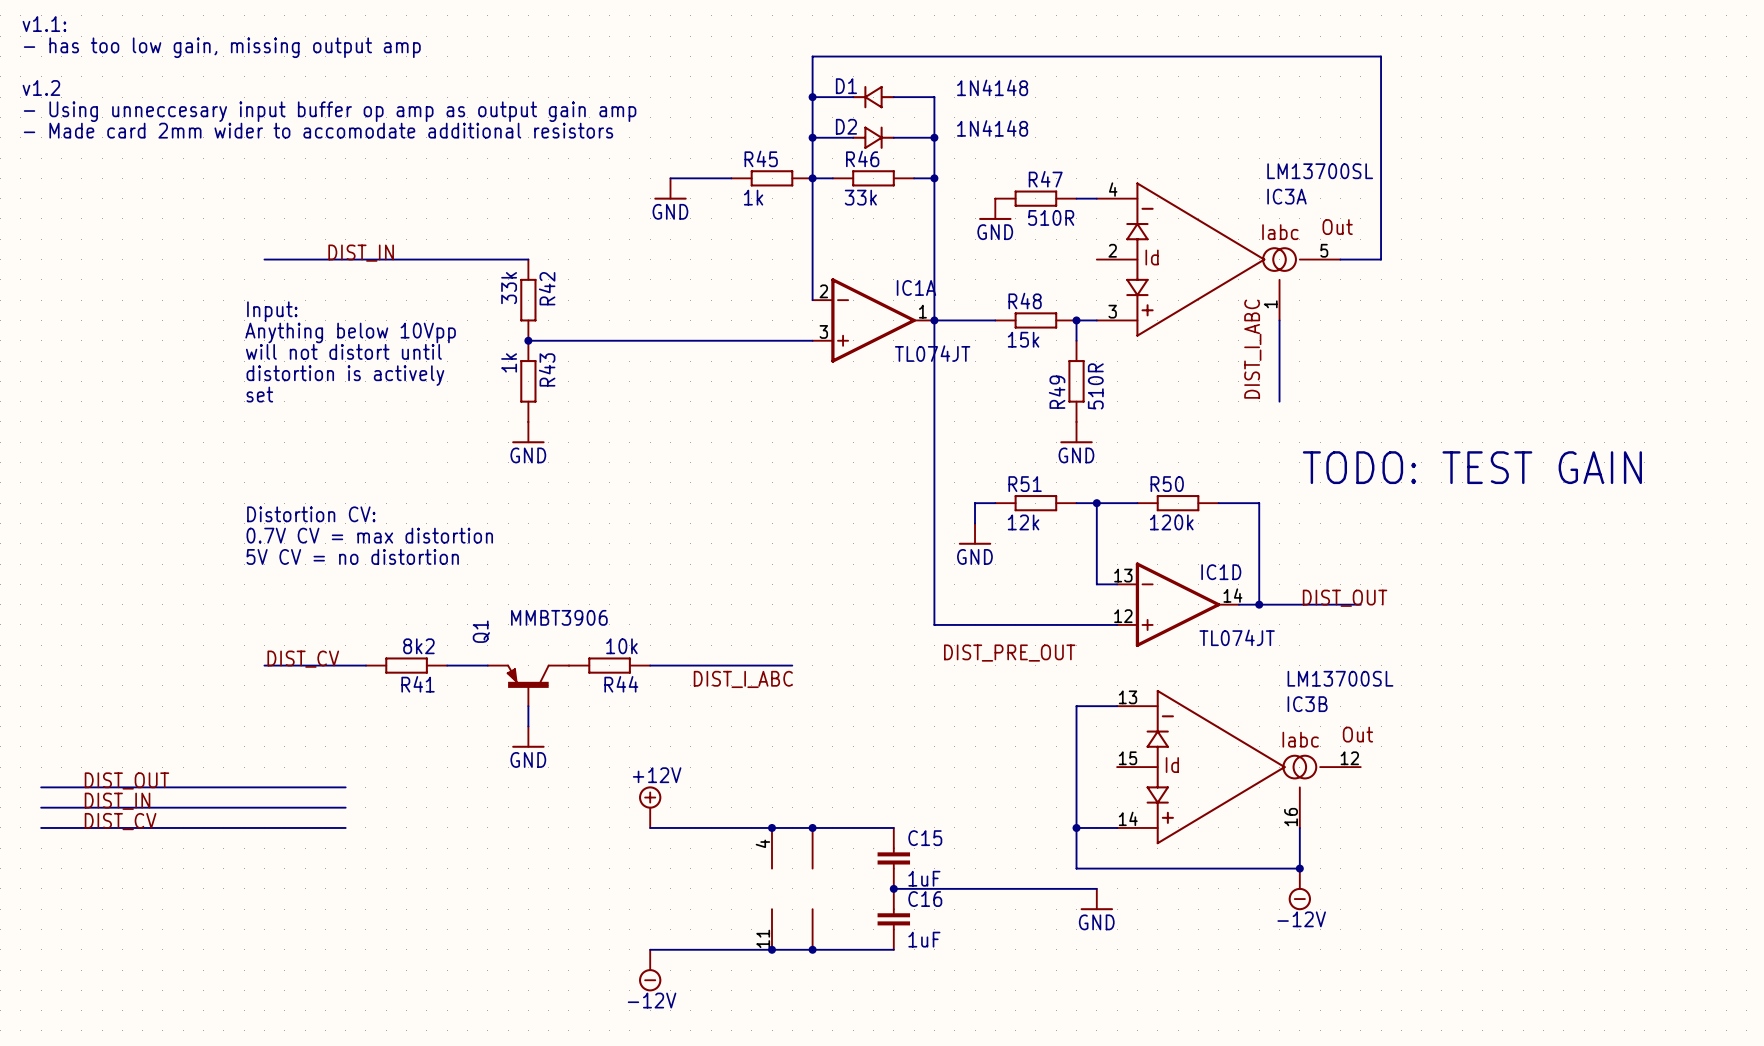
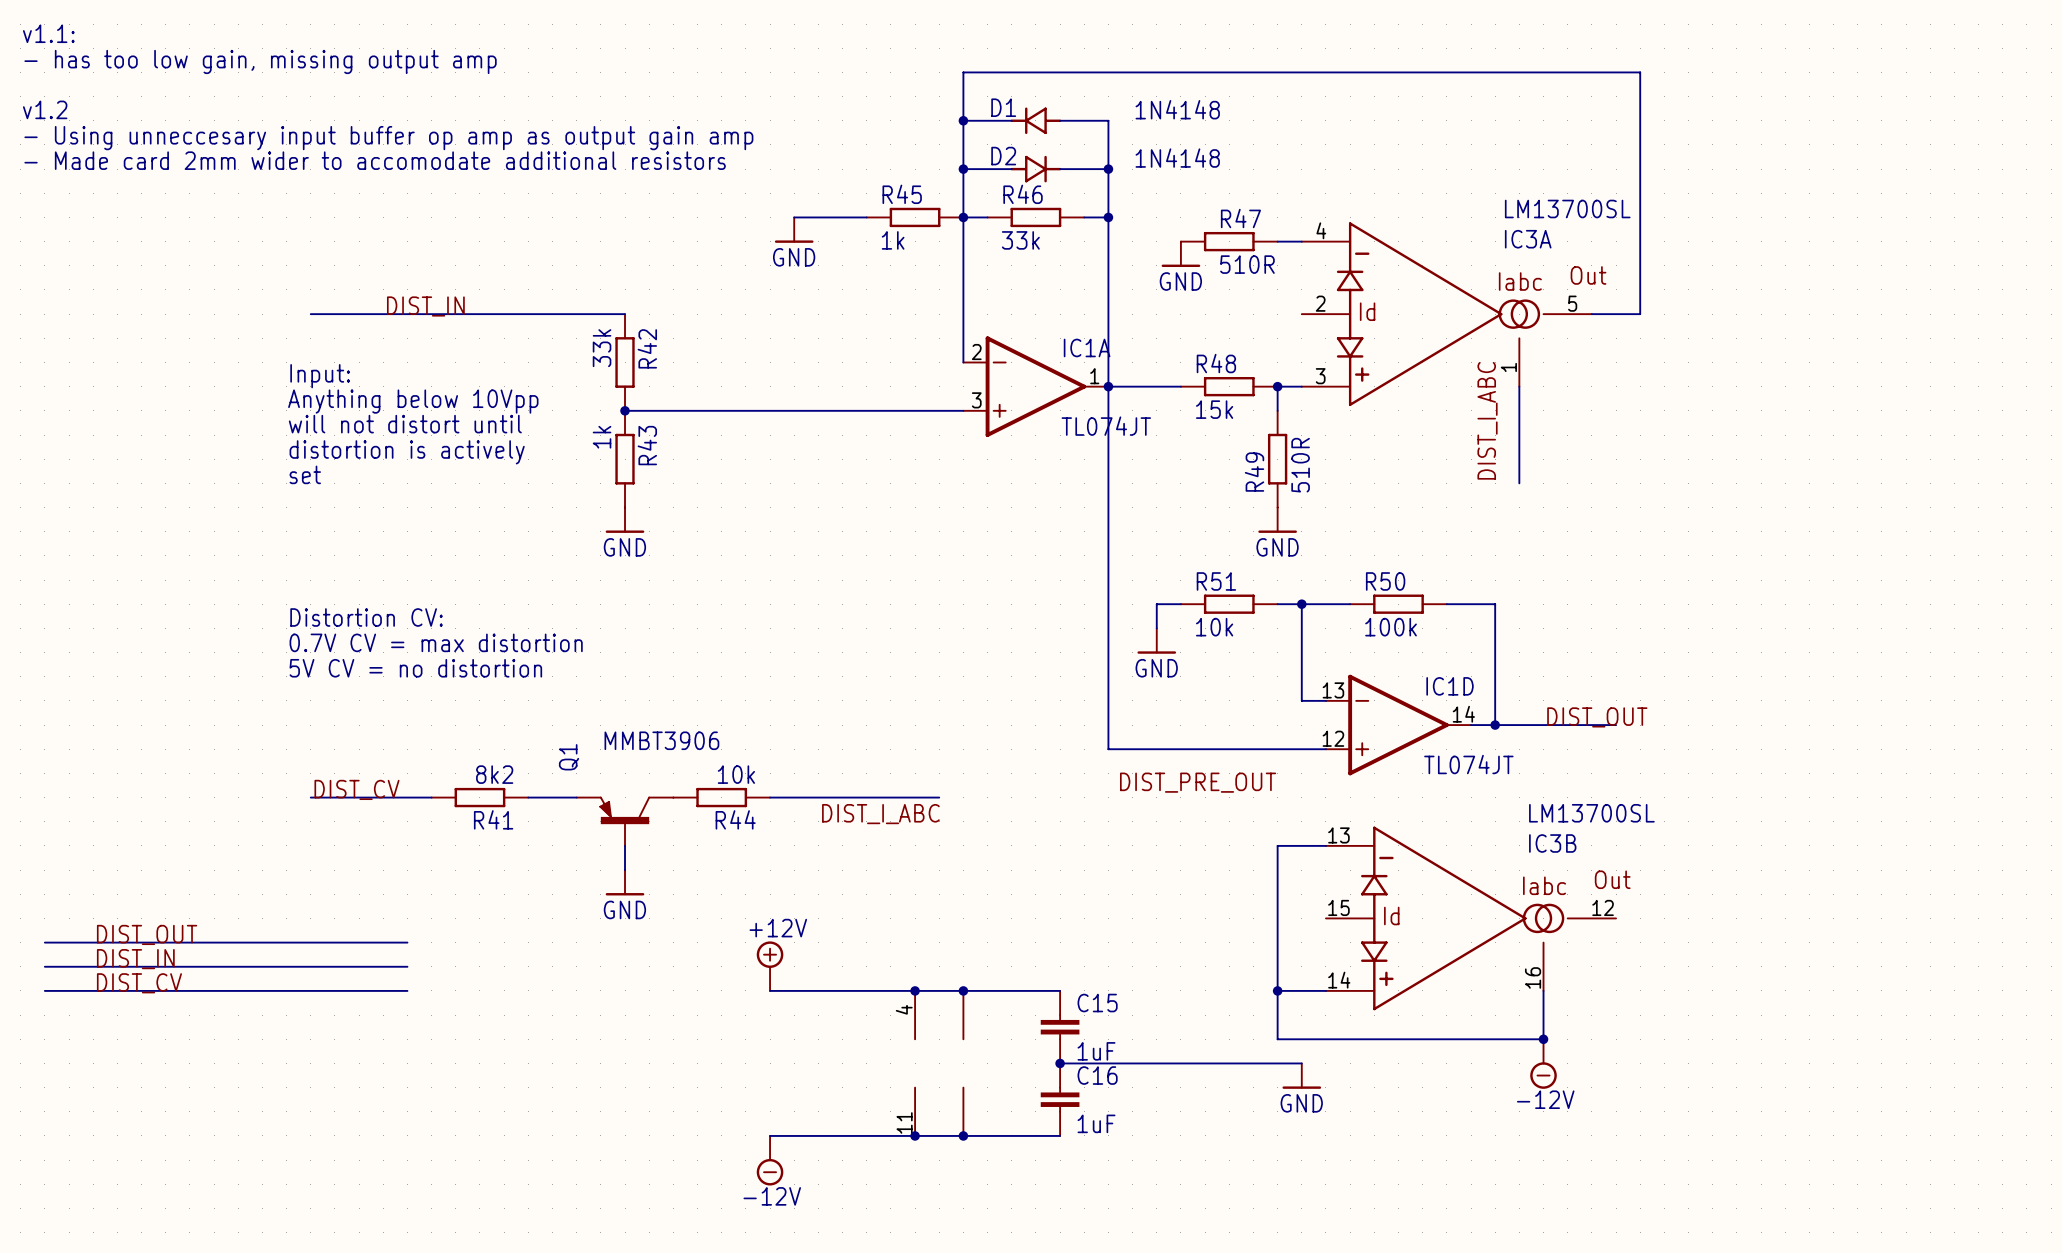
text: TODO: TEST GAIN (1472, 467) -> none
R51 value: 12k (1023, 522) -> 10k (1214, 627)
R50 value: 120k (1171, 522) -> 100k (1391, 627)

